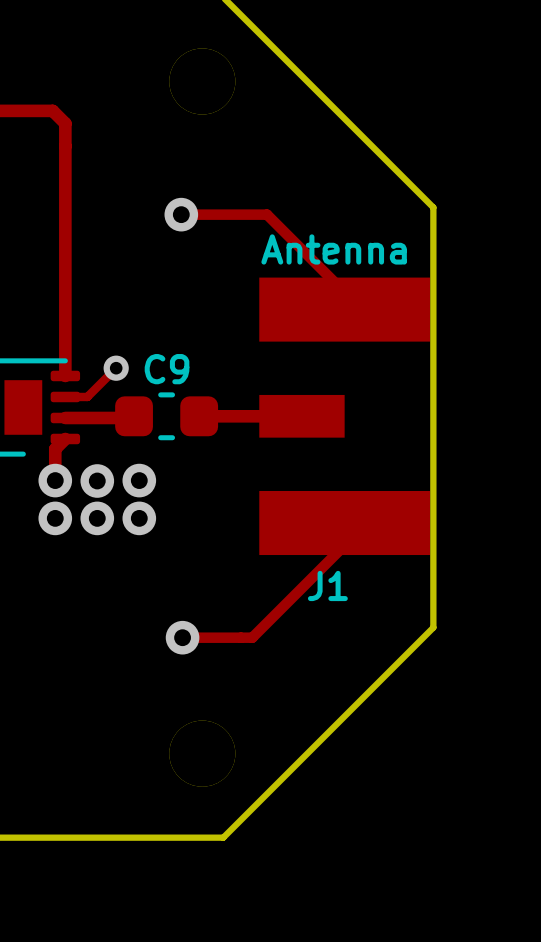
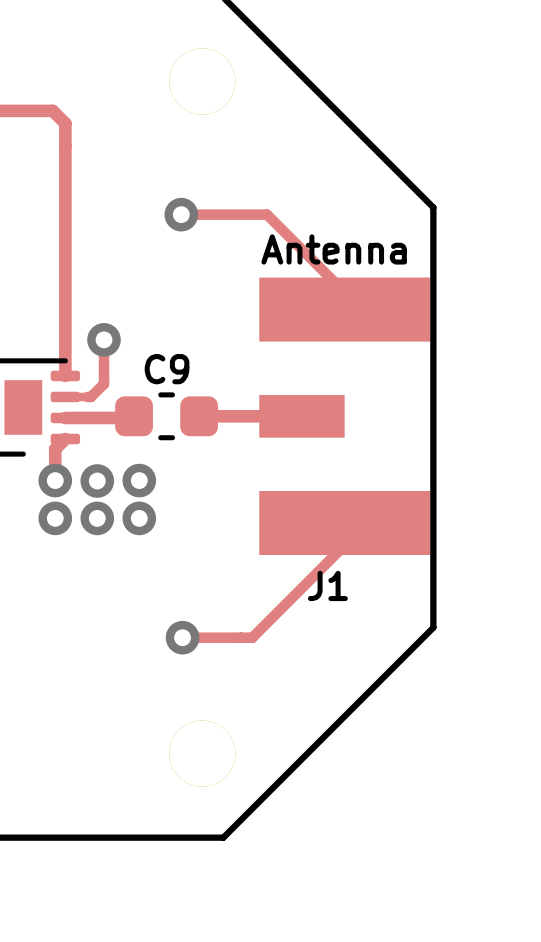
track: (116, 368) (87, 396) -> (104, 339) (104, 383) (90, 396) (87, 396)
via position: (116, 368) -> (104, 339)

